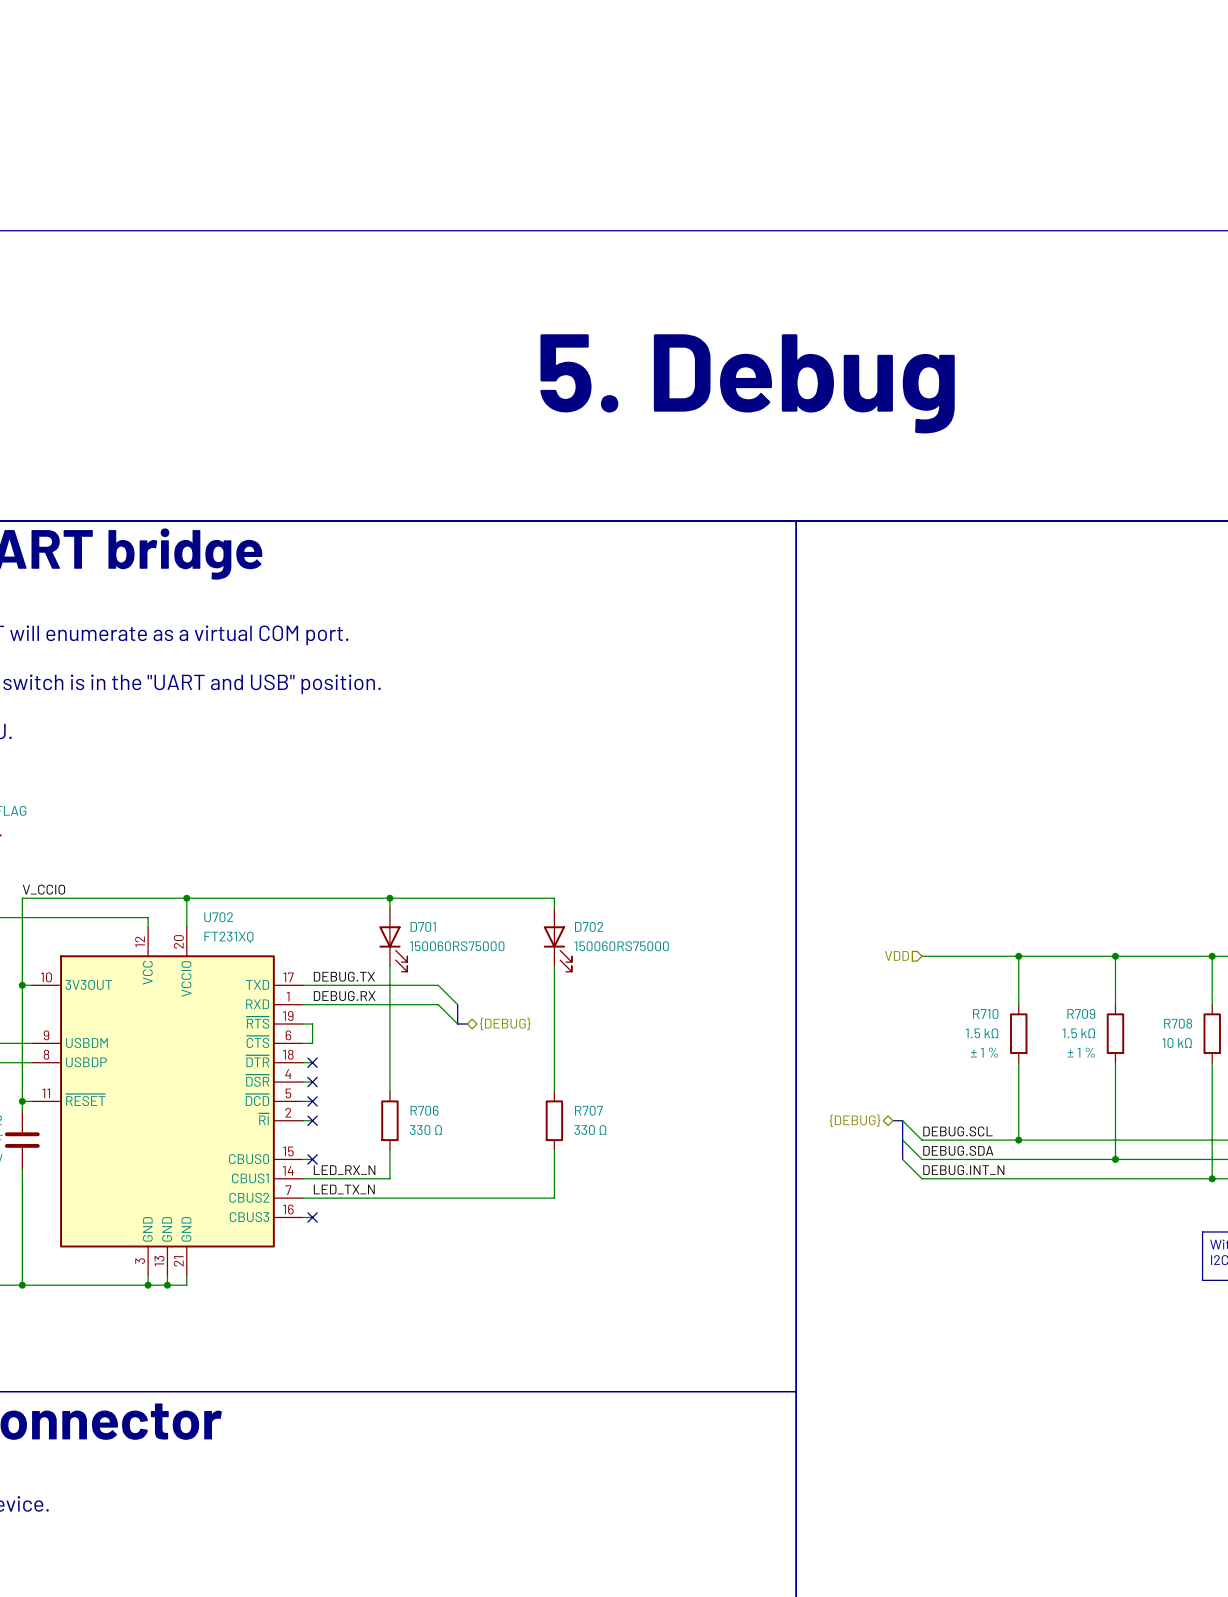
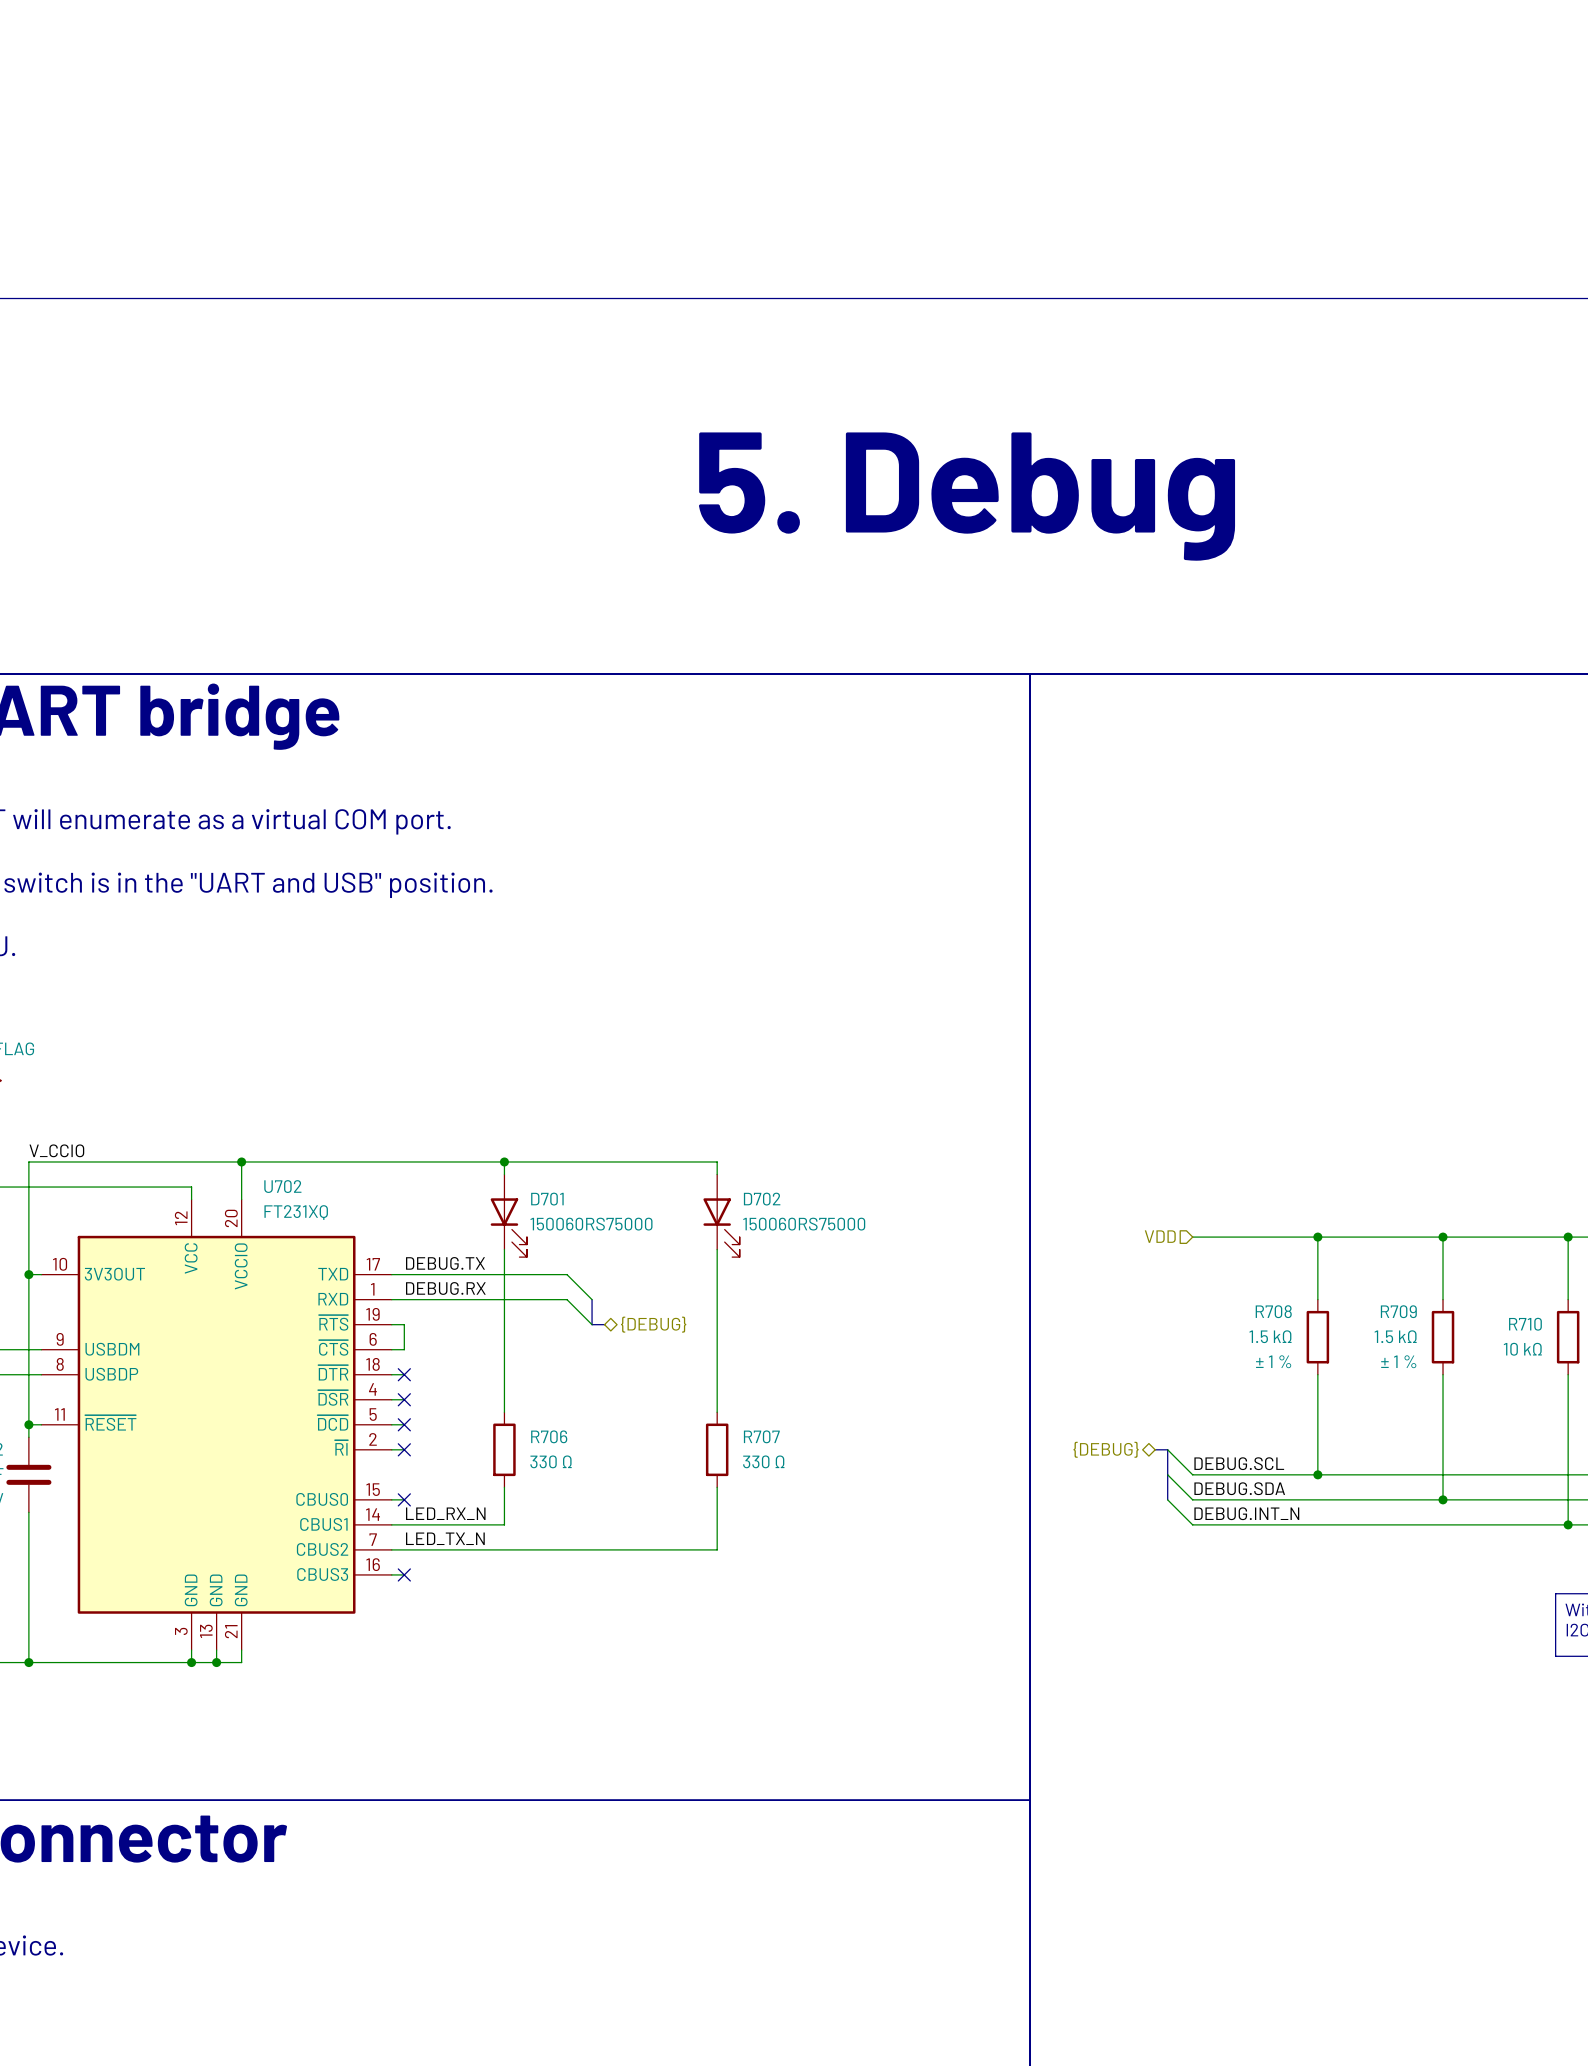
R710 name: R710 (985, 1013) -> R708 (1273, 1311)
R708 name: R708 (1178, 1023) -> R710 (1525, 1324)

